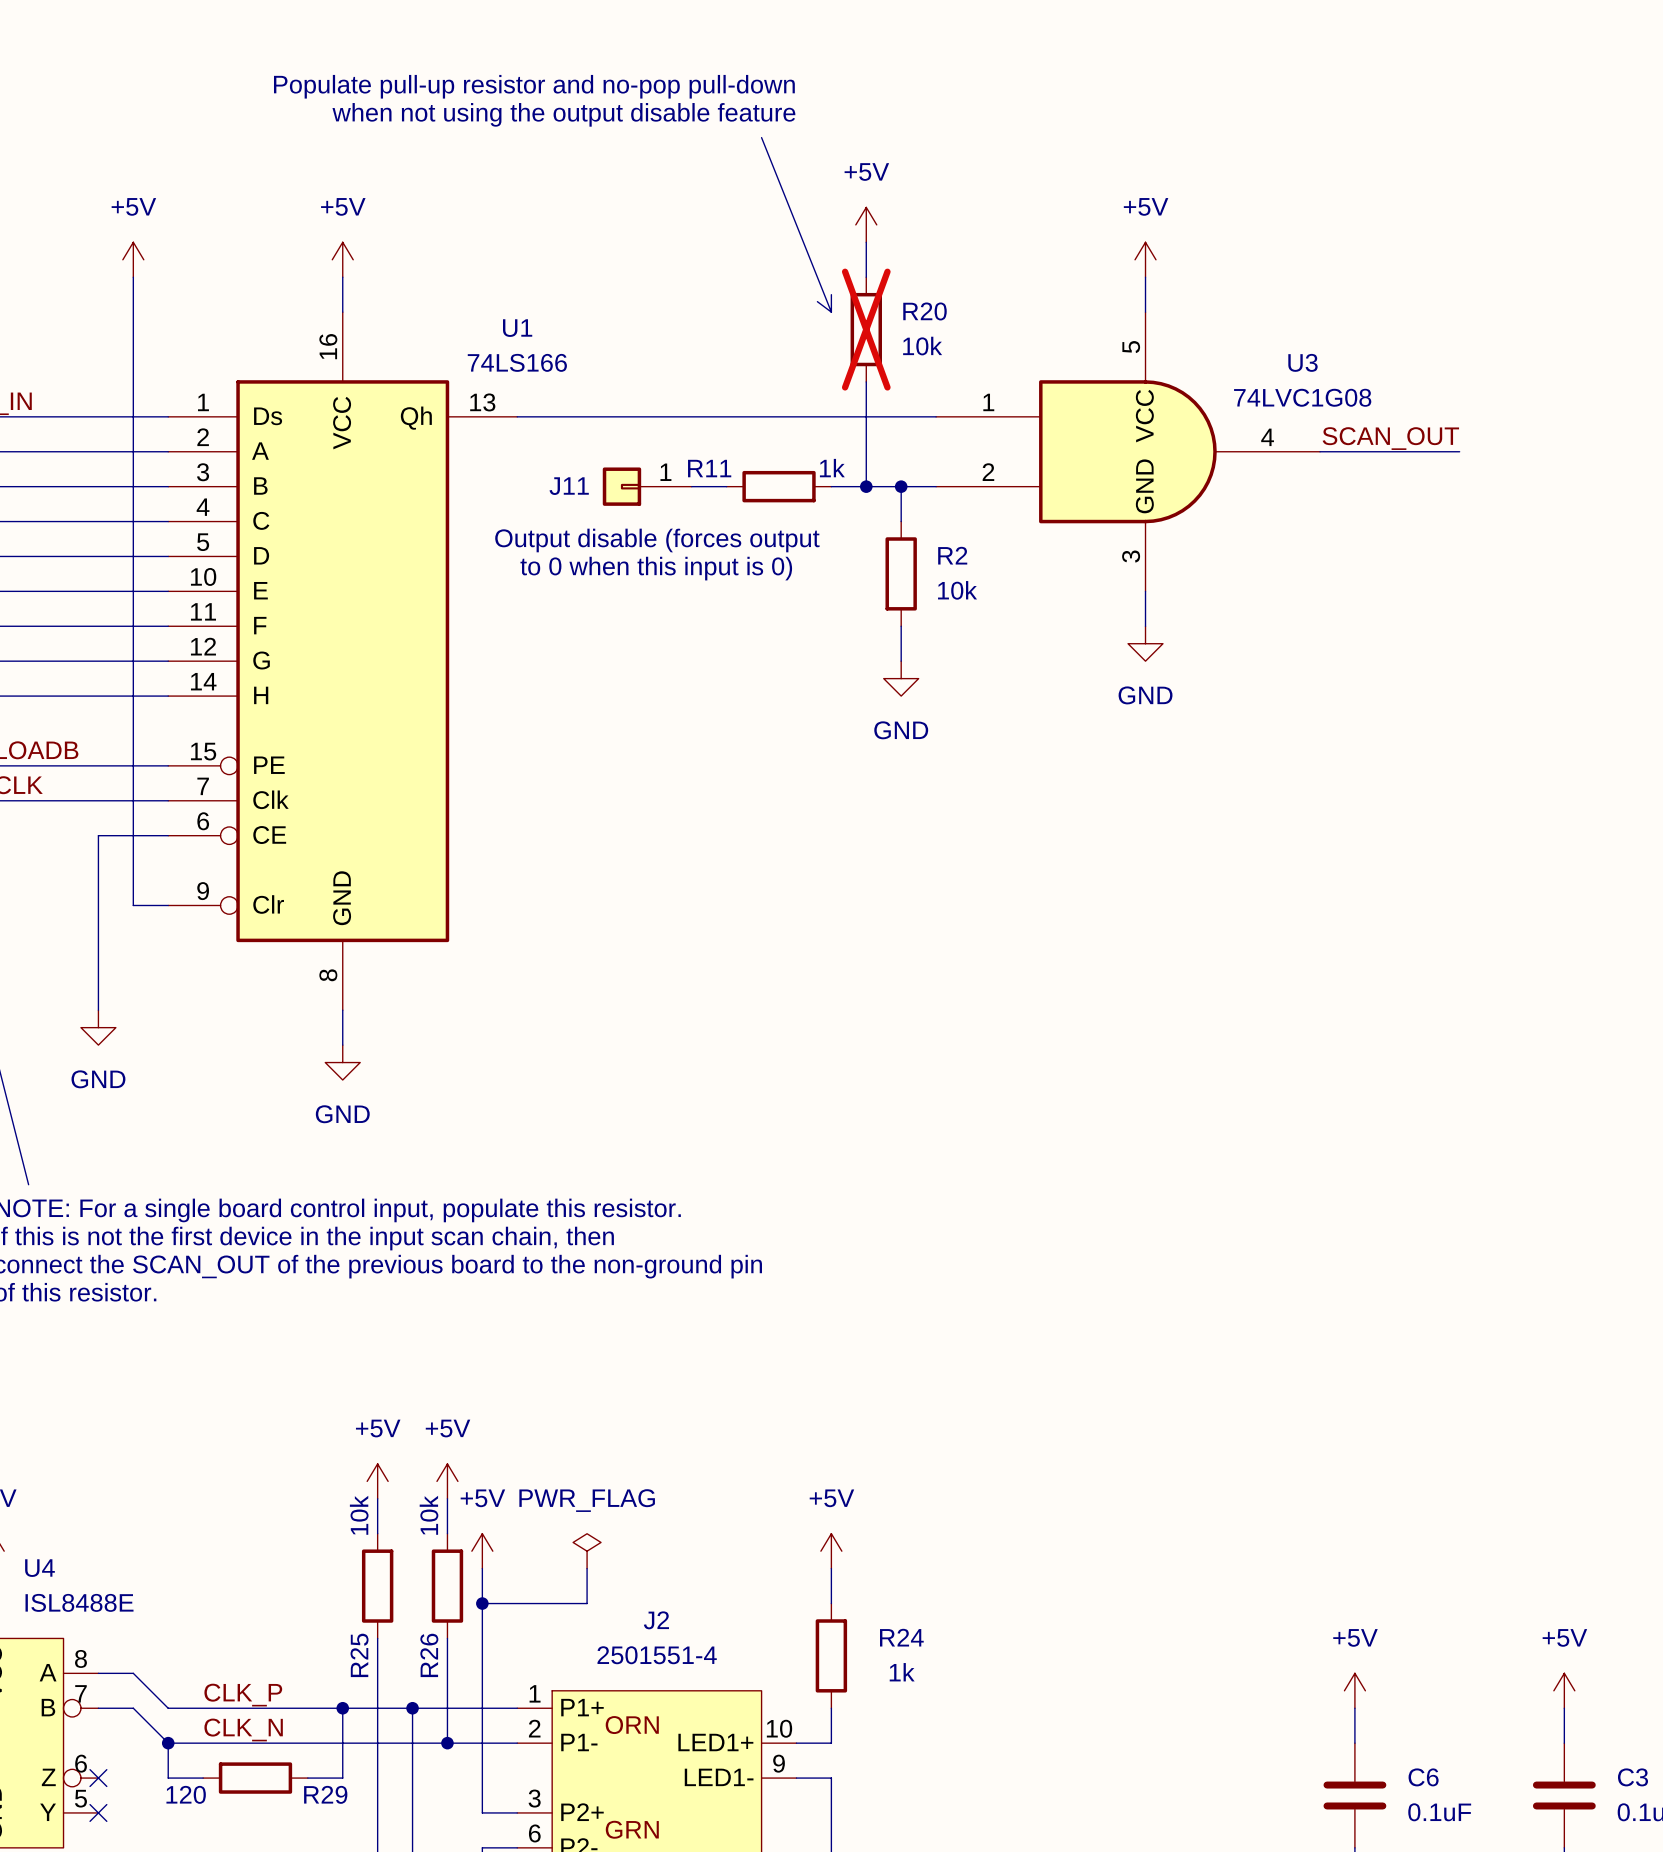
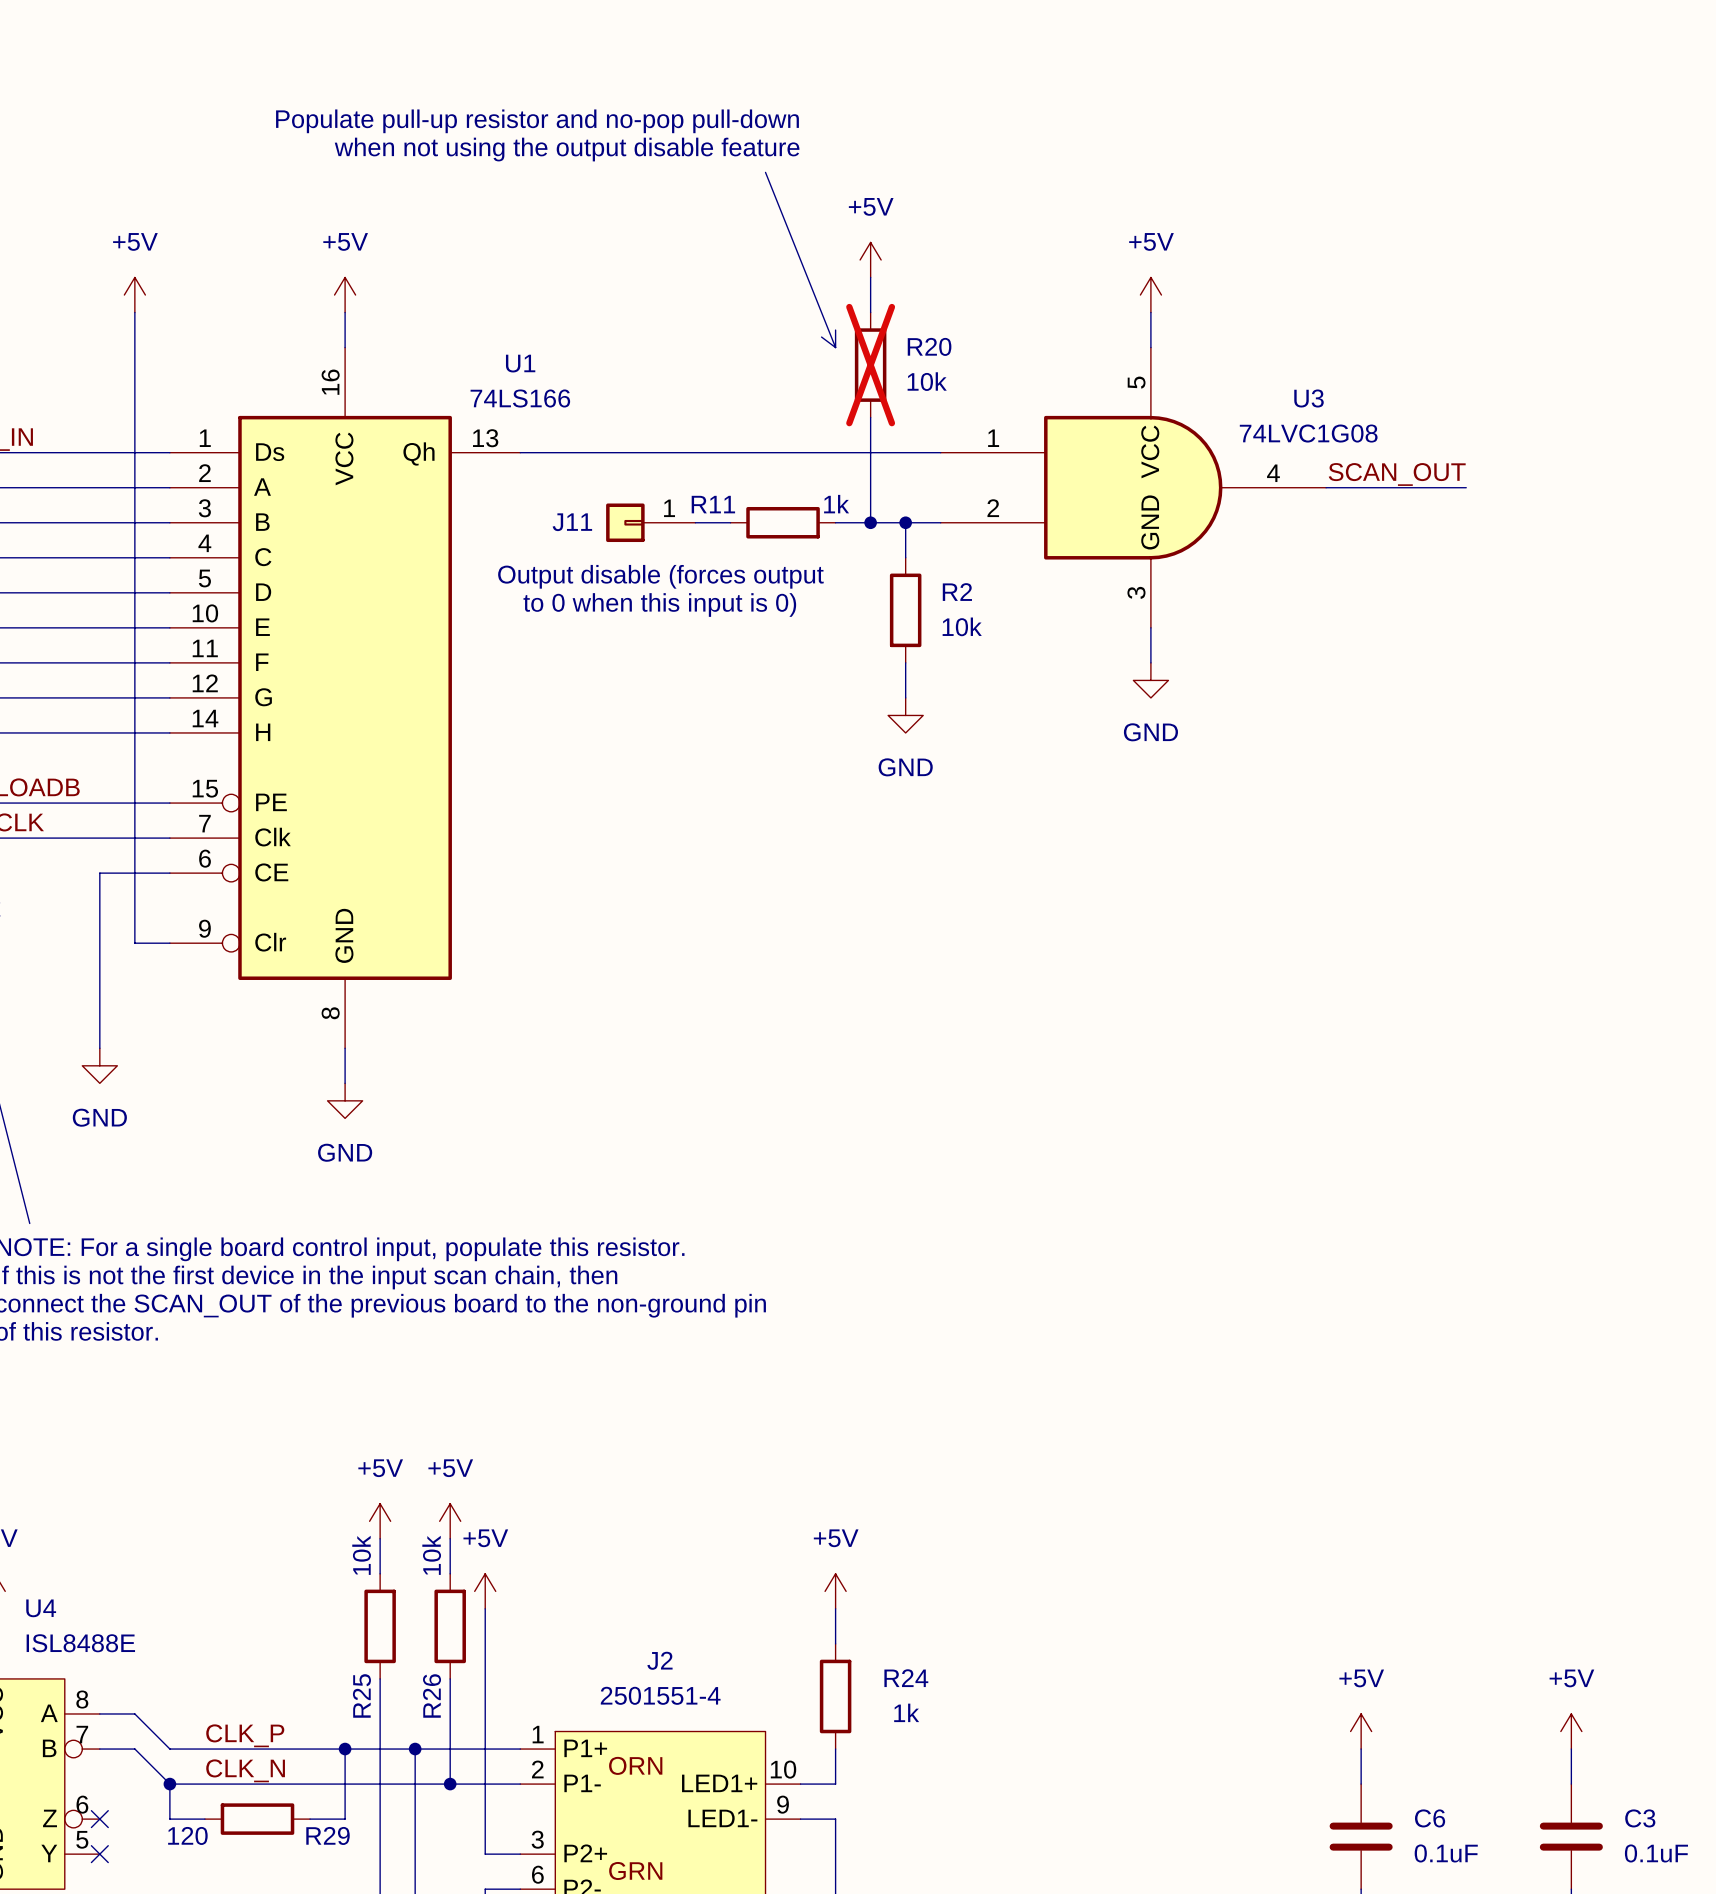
power symbol: PWR_FLAG (587, 1551) -> none
wire: (587, 1568) (587, 1603) (482, 1603) -> none
junction: (482, 1603) -> none

